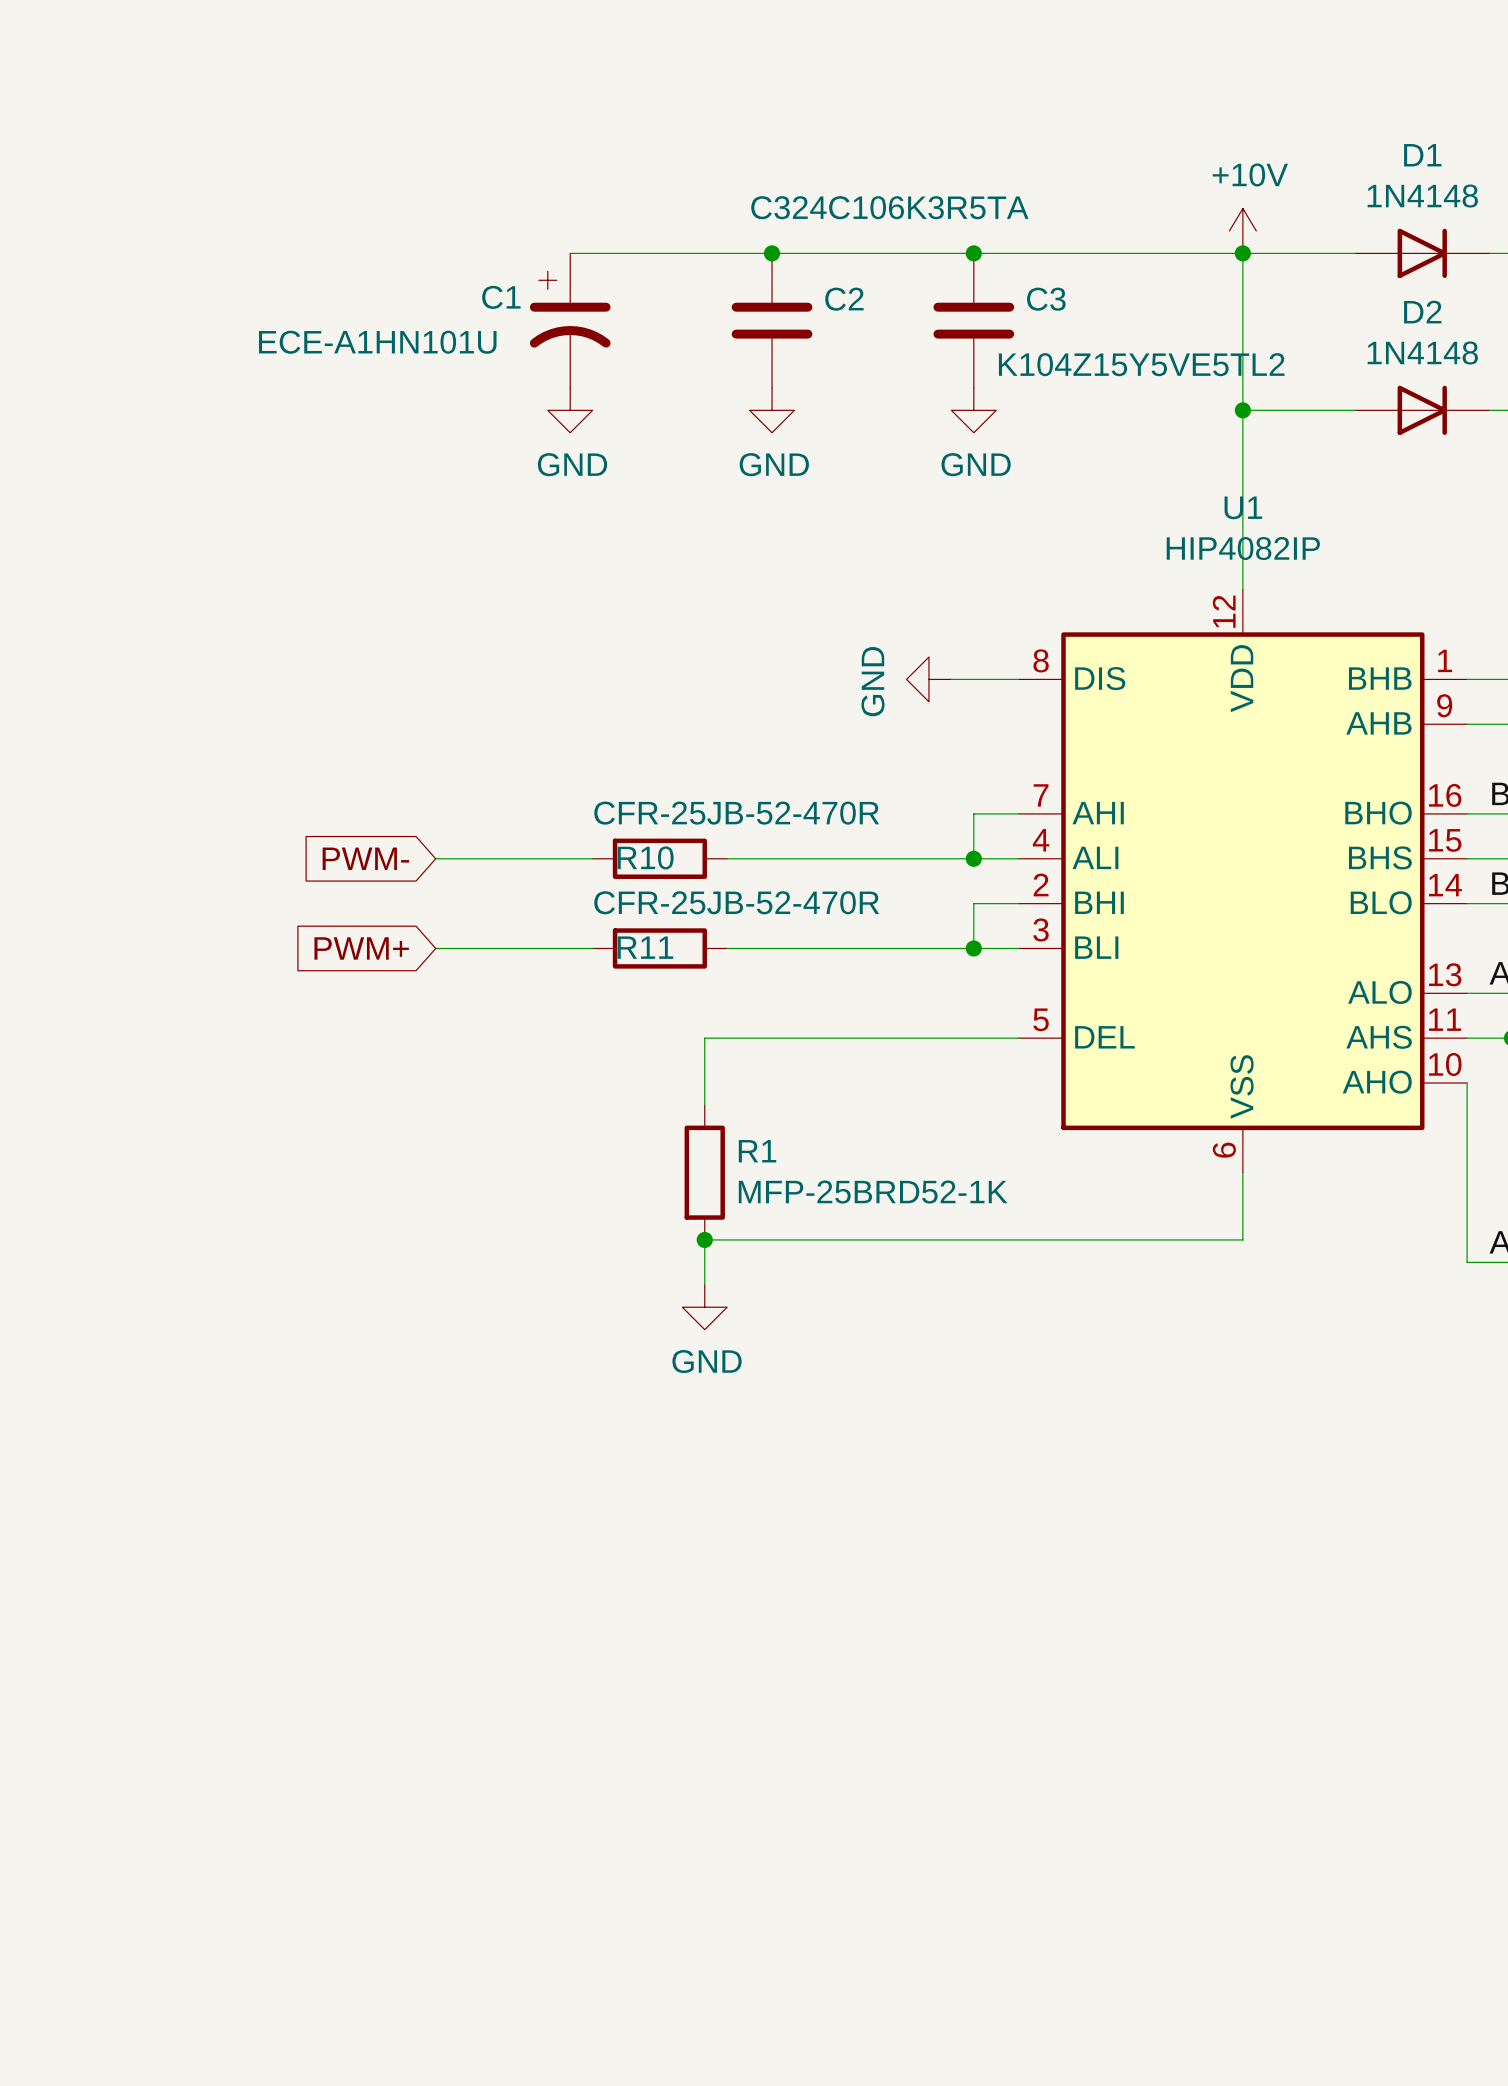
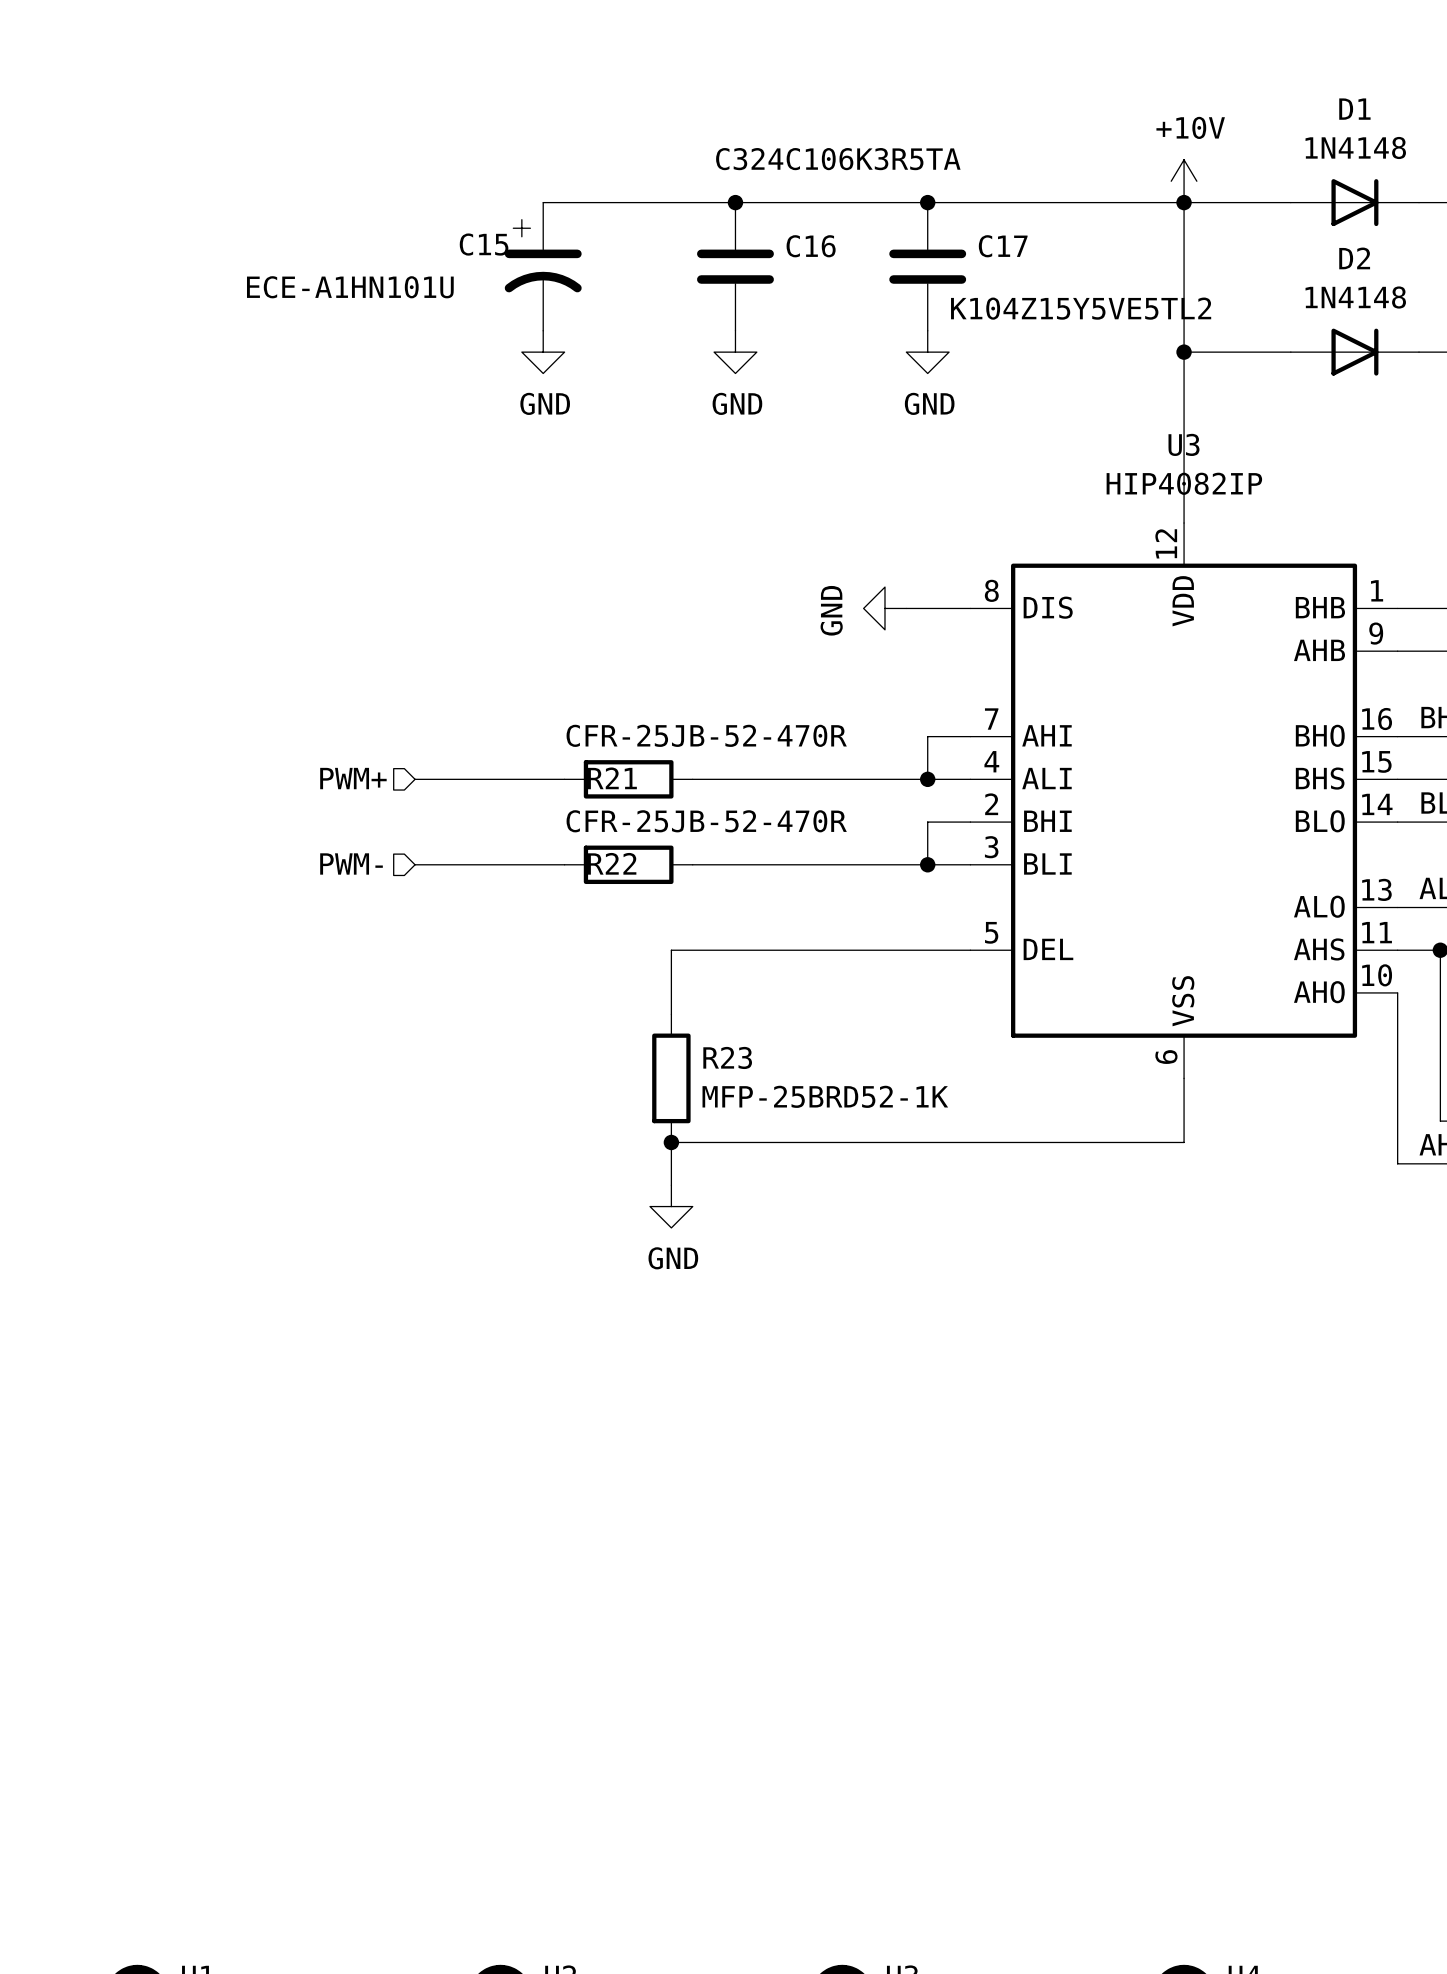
C1 name: C1 (501, 297) -> C15 (484, 244)
C2 name: C2 (844, 299) -> C16 (811, 246)
C3 name: C3 (1046, 299) -> C17 (1003, 246)
U1 name: U1 (1243, 507) -> U3 (1183, 444)
hierarchical label: none -> PWM+ (353, 778)
R10 name: R10 (645, 857) -> R21 (612, 778)
global label: PWM- (365, 858) -> none
hierarchical label: none -> PWM- (351, 863)
R11 name: R11 (645, 947) -> R22 (612, 863)
global label: PWM+ (361, 948) -> none
R1 name: R1 (757, 1151) -> R23 (727, 1057)

